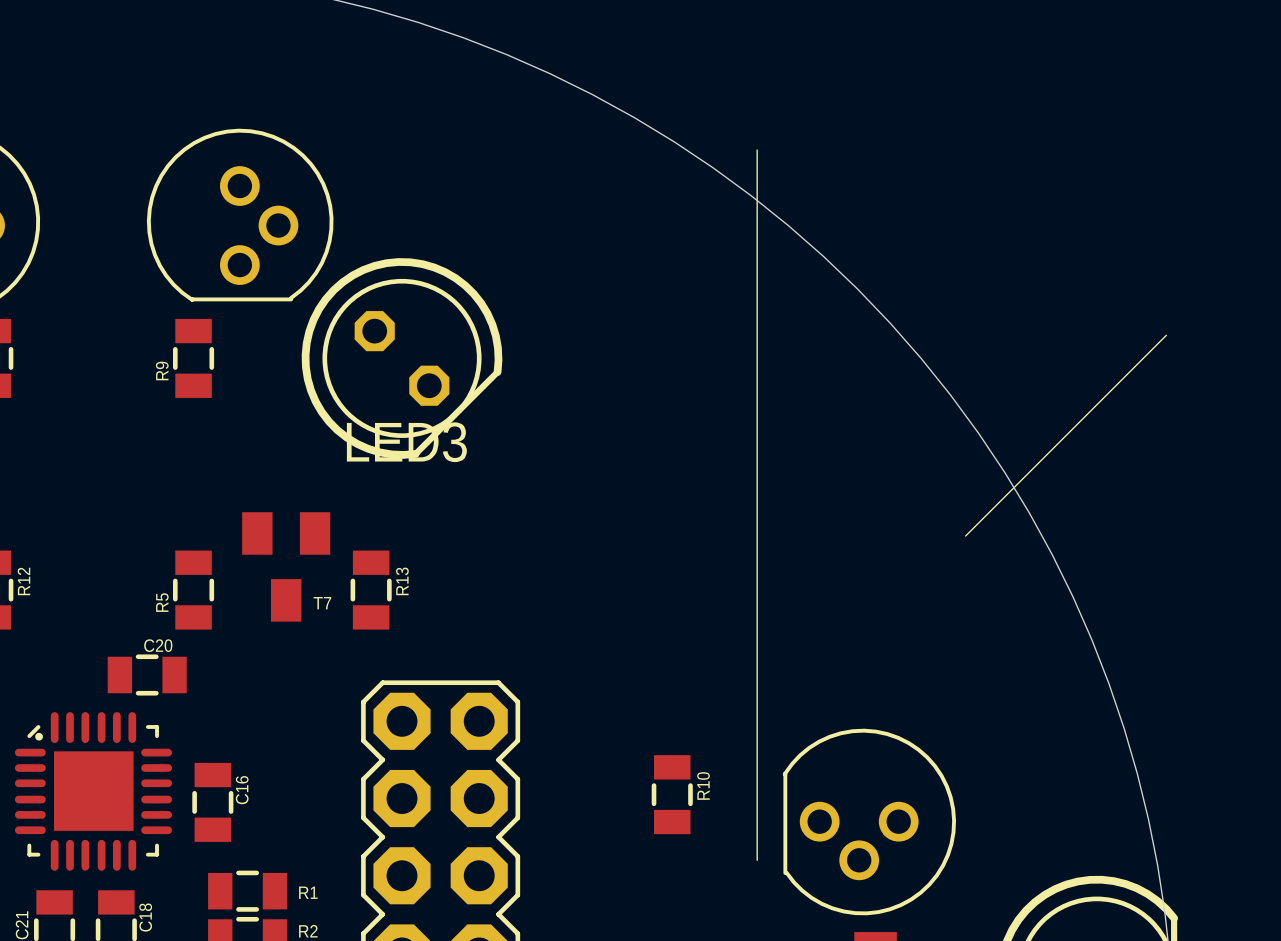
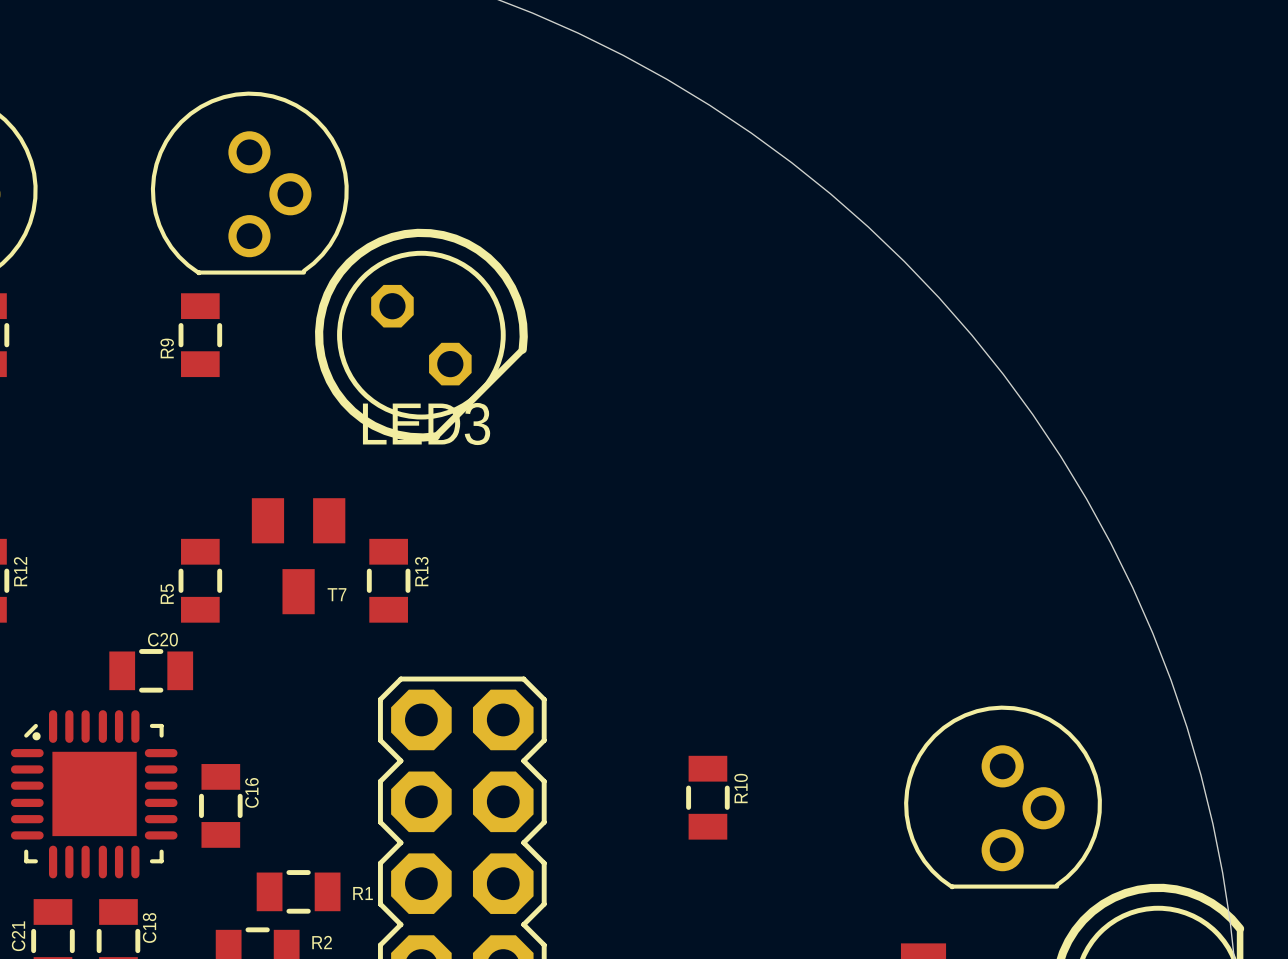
line: (757, 149) (757, 860) -> none
line: (1166, 335) (965, 536) -> none
part rotation: 0° (869, 822) -> 90° counterclockwise (1002, 797)
R1 position: (247, 891) -> (298, 891)

